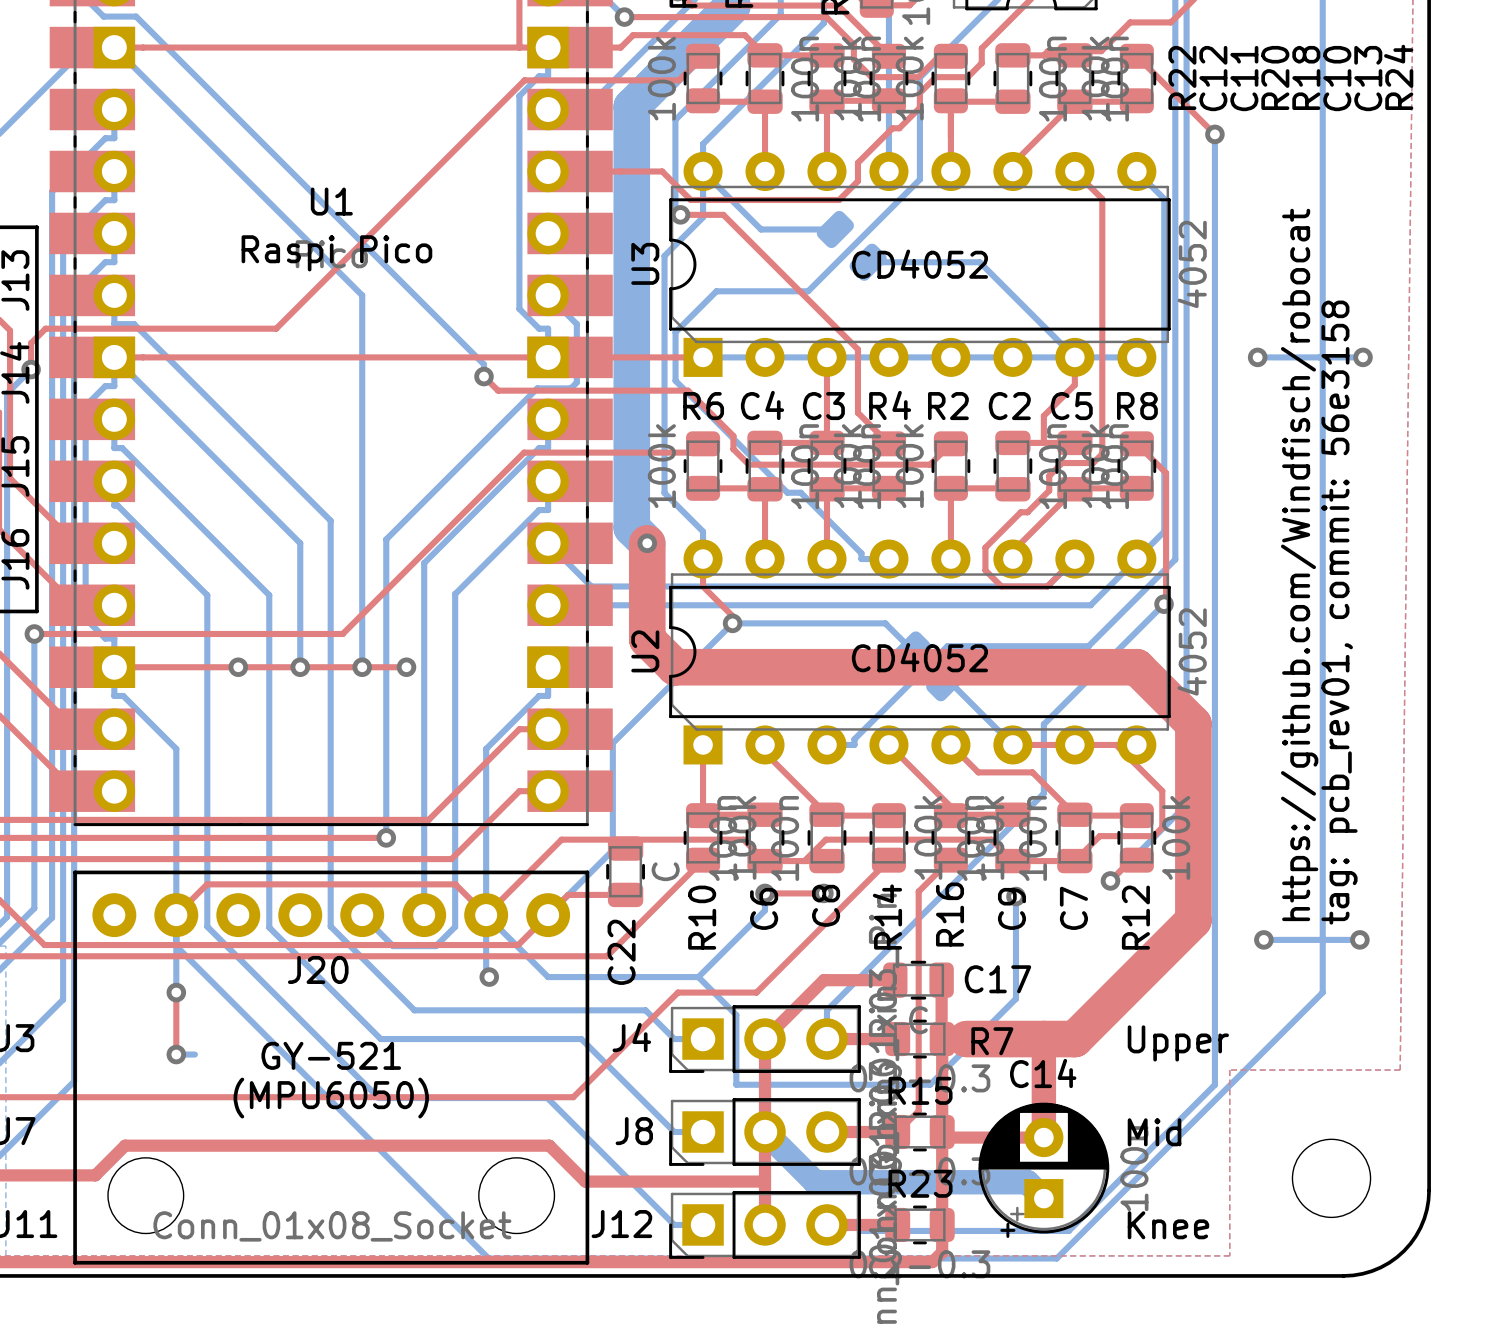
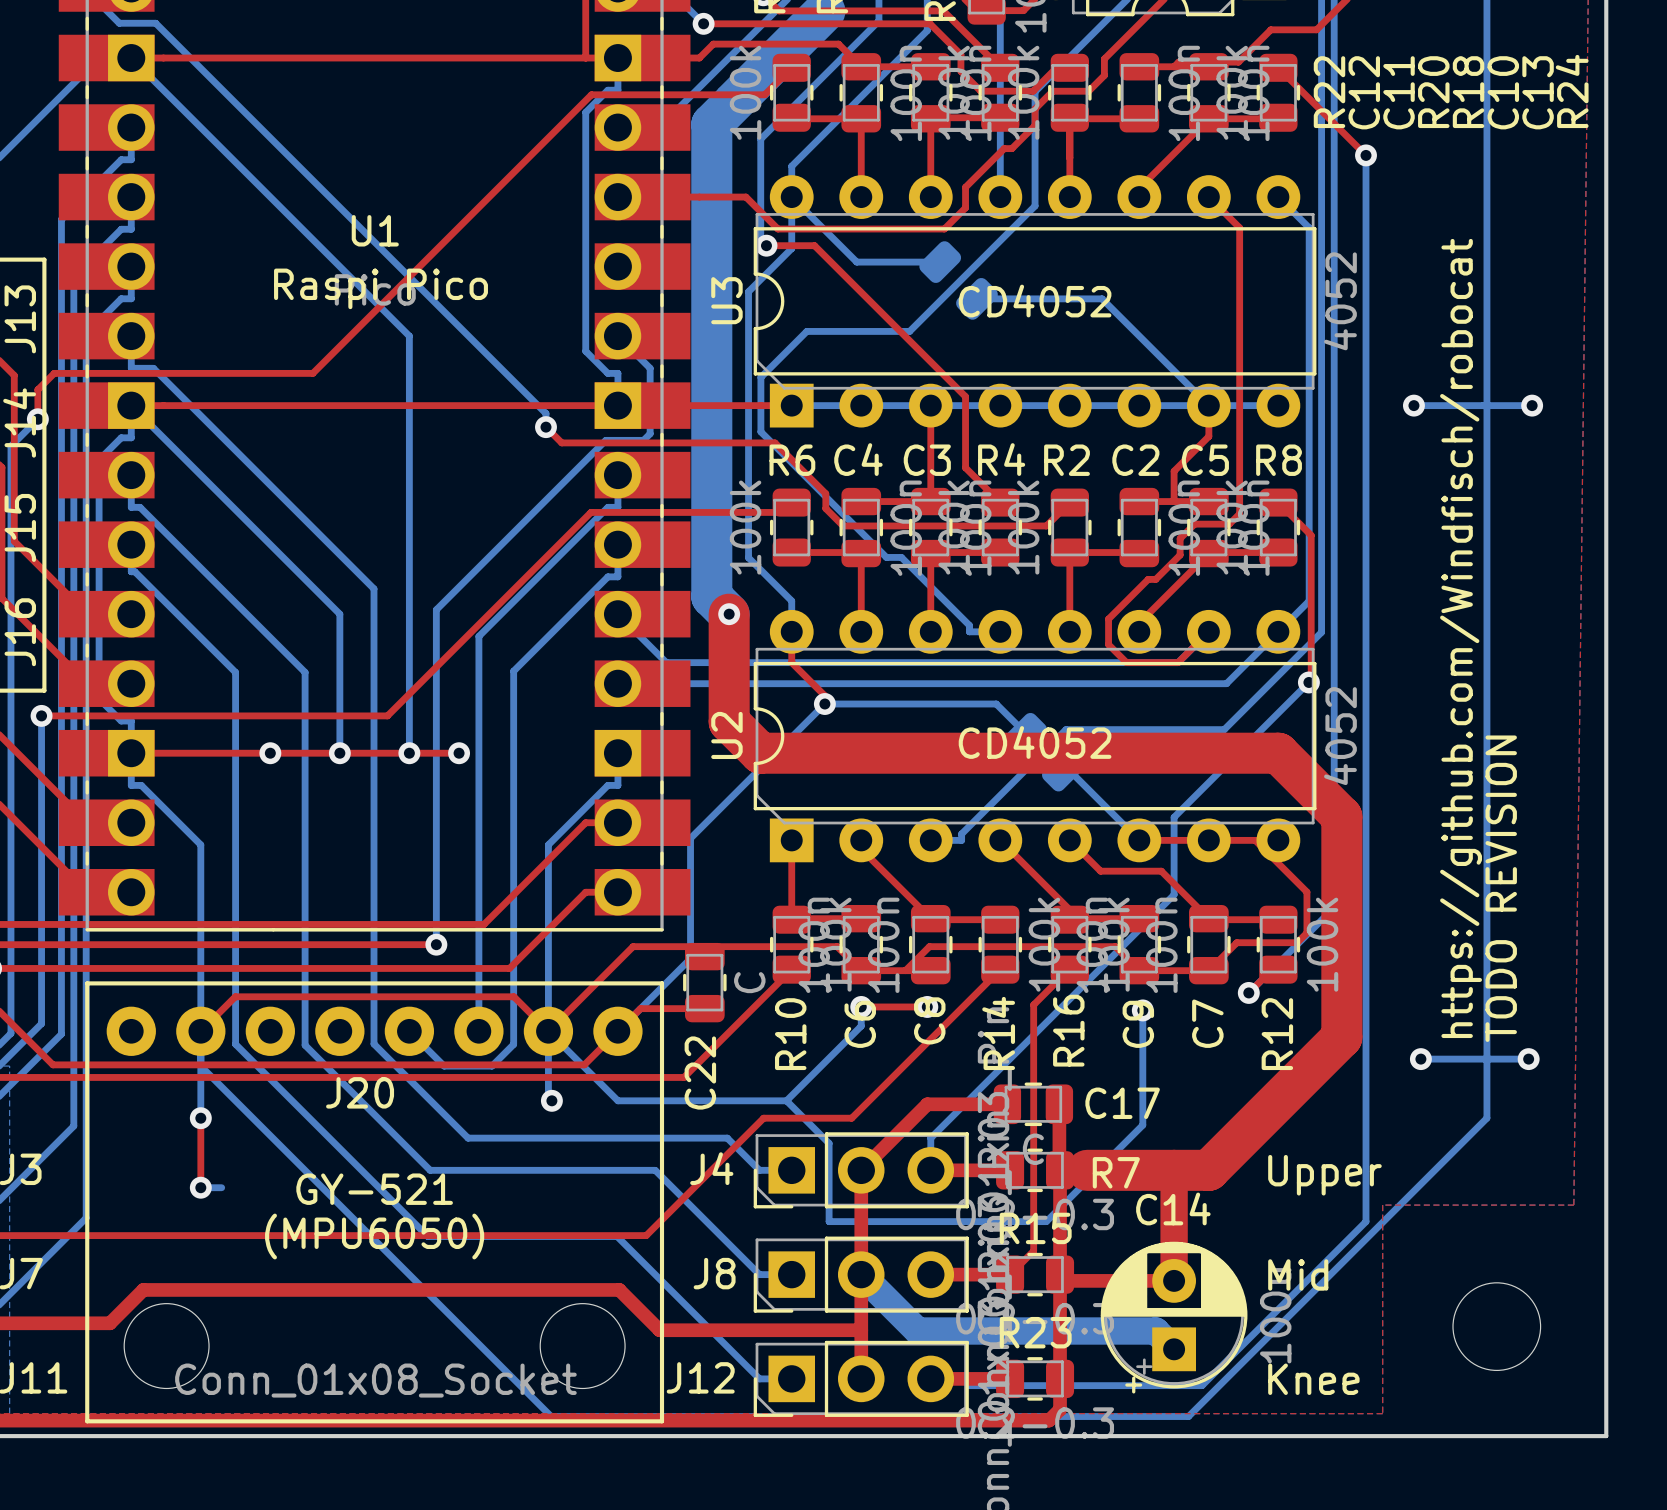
text: tag: pcb_rev01, commit: 56e3158 (1339, 612) -> TODO REVISION (1501, 888)
board edge: (1429, 1190) (1426, 1209) (1420, 1227) (1404, 1250) (1389, 1262) (1371, 1271) (1343, 1275) -> (1606, 1340) (1606, 1436) (1510, 1436)

